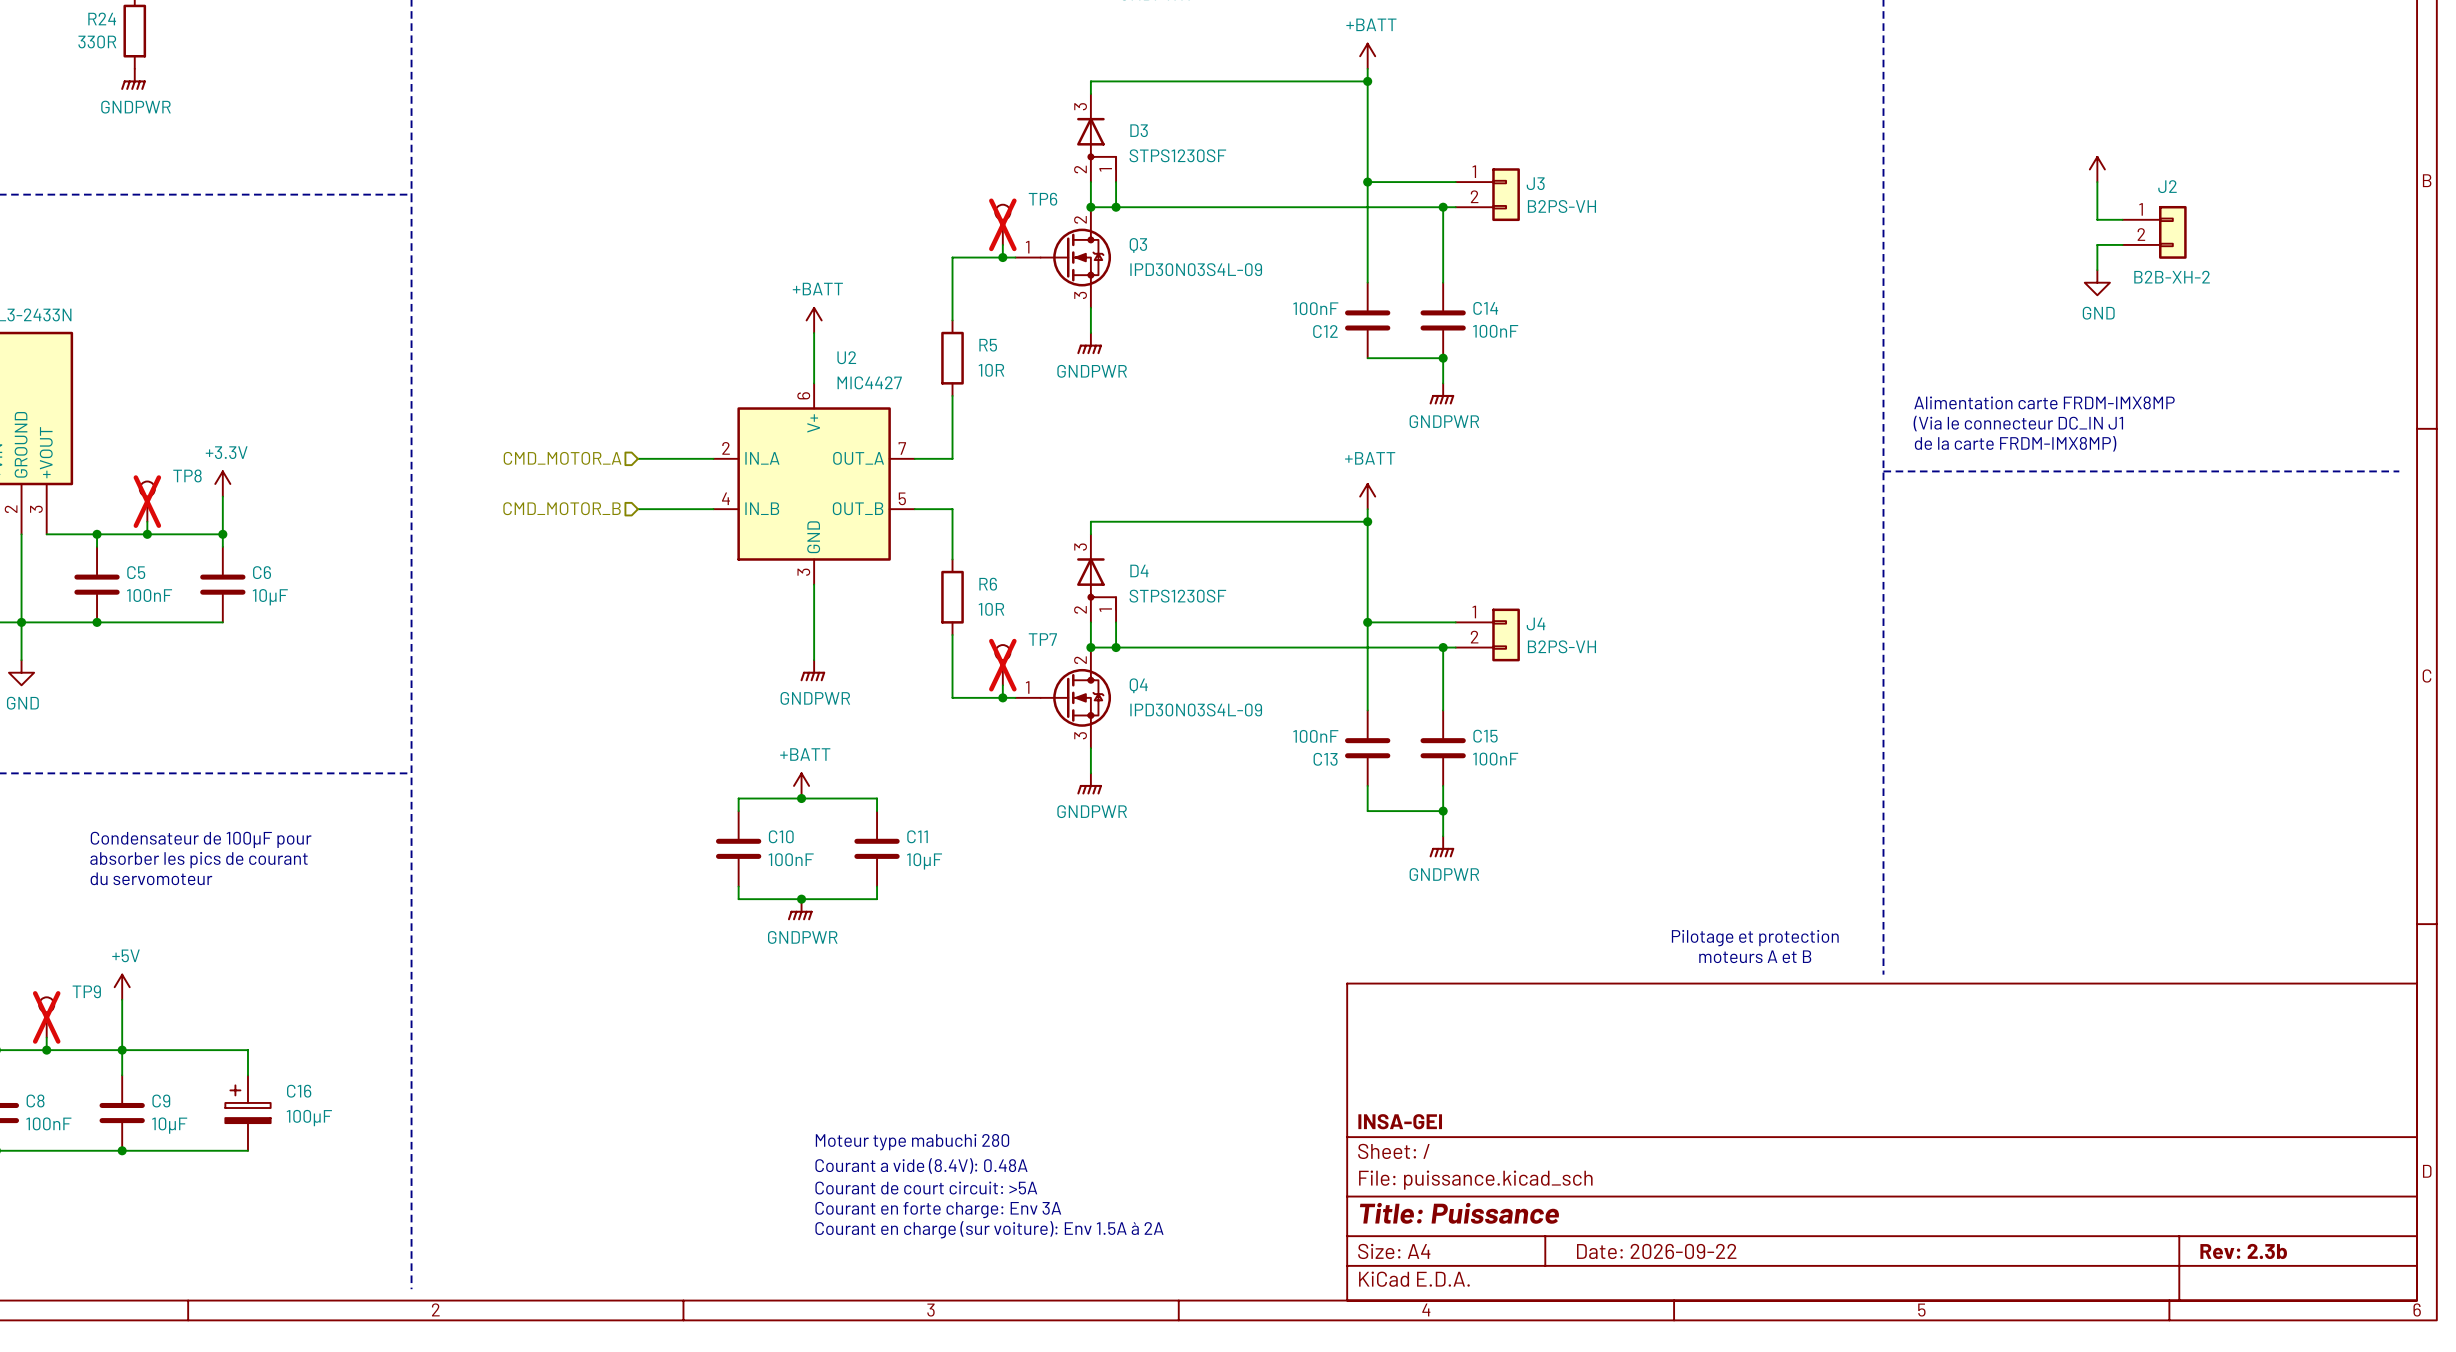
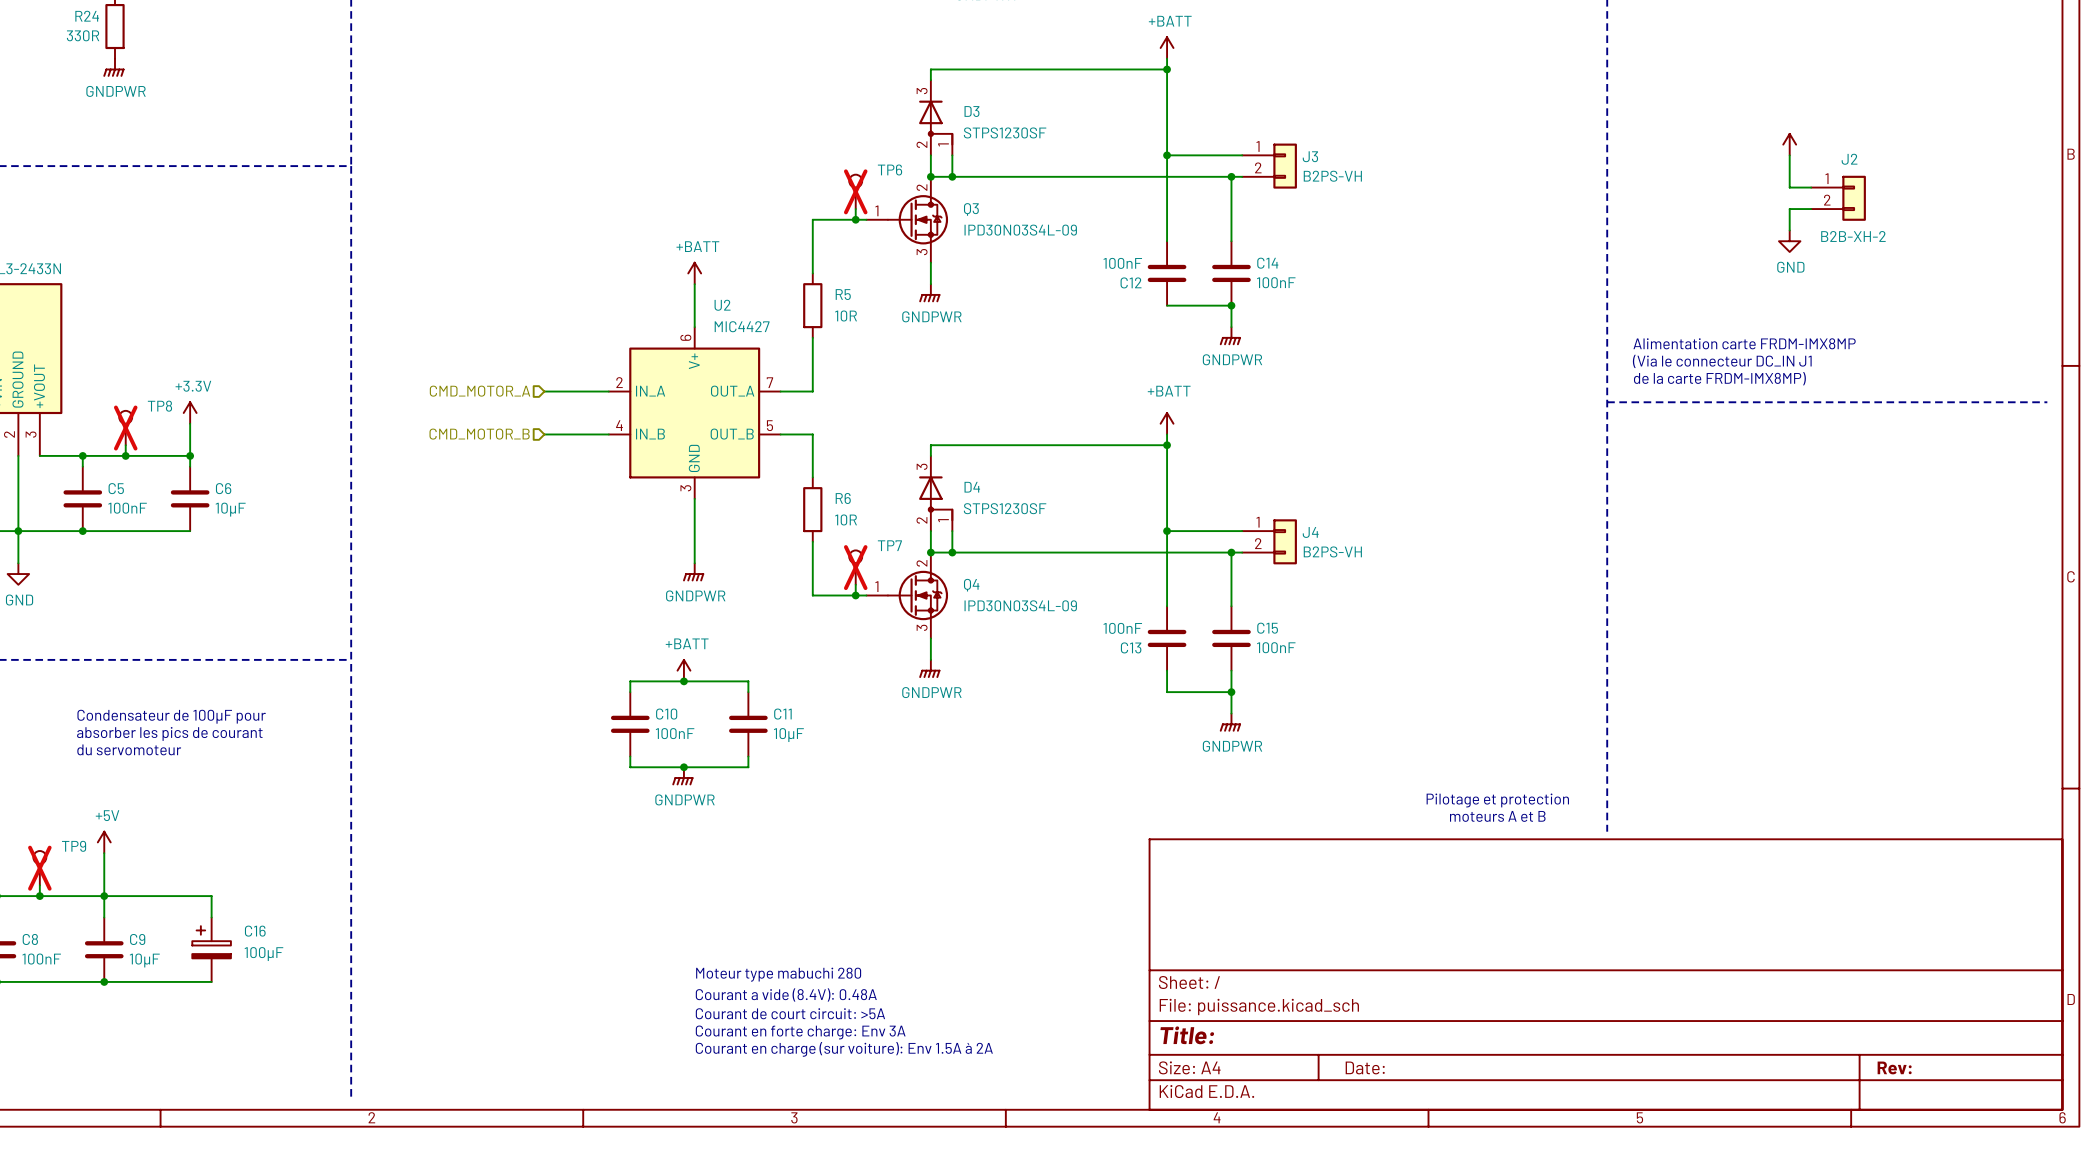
title block: INSA-GEI (1400, 1121) -> none
title block: Title: Puissance (1459, 1213) -> Title: (1187, 1035)
title block: Date: 2026-09-22 (1656, 1251) -> Date: (1365, 1067)
title block: Rev: 2.3b (2243, 1251) -> Rev: (1894, 1067)

